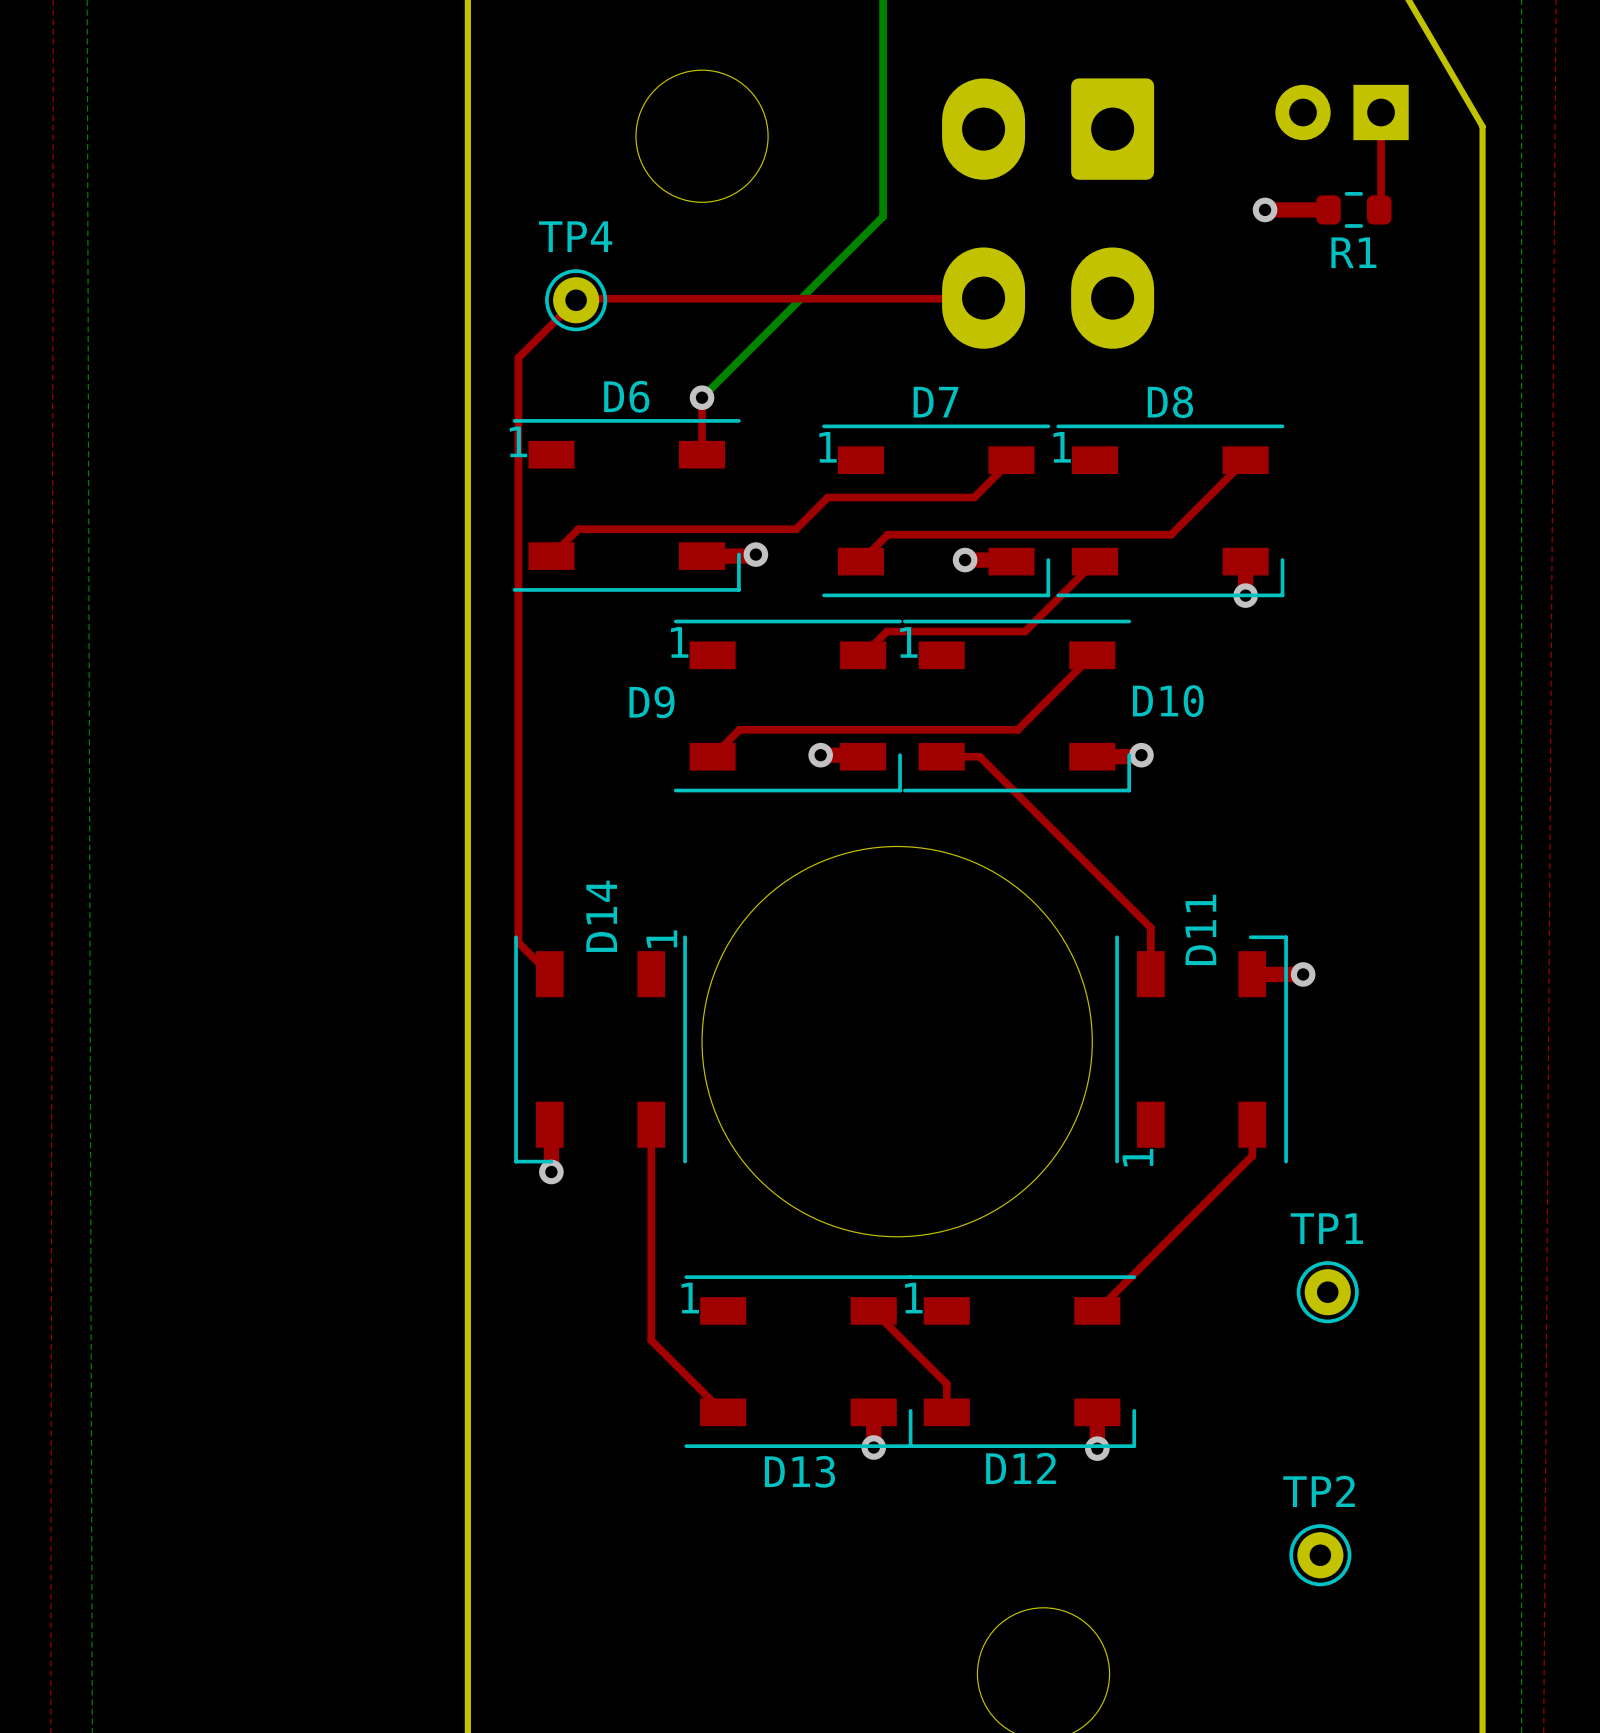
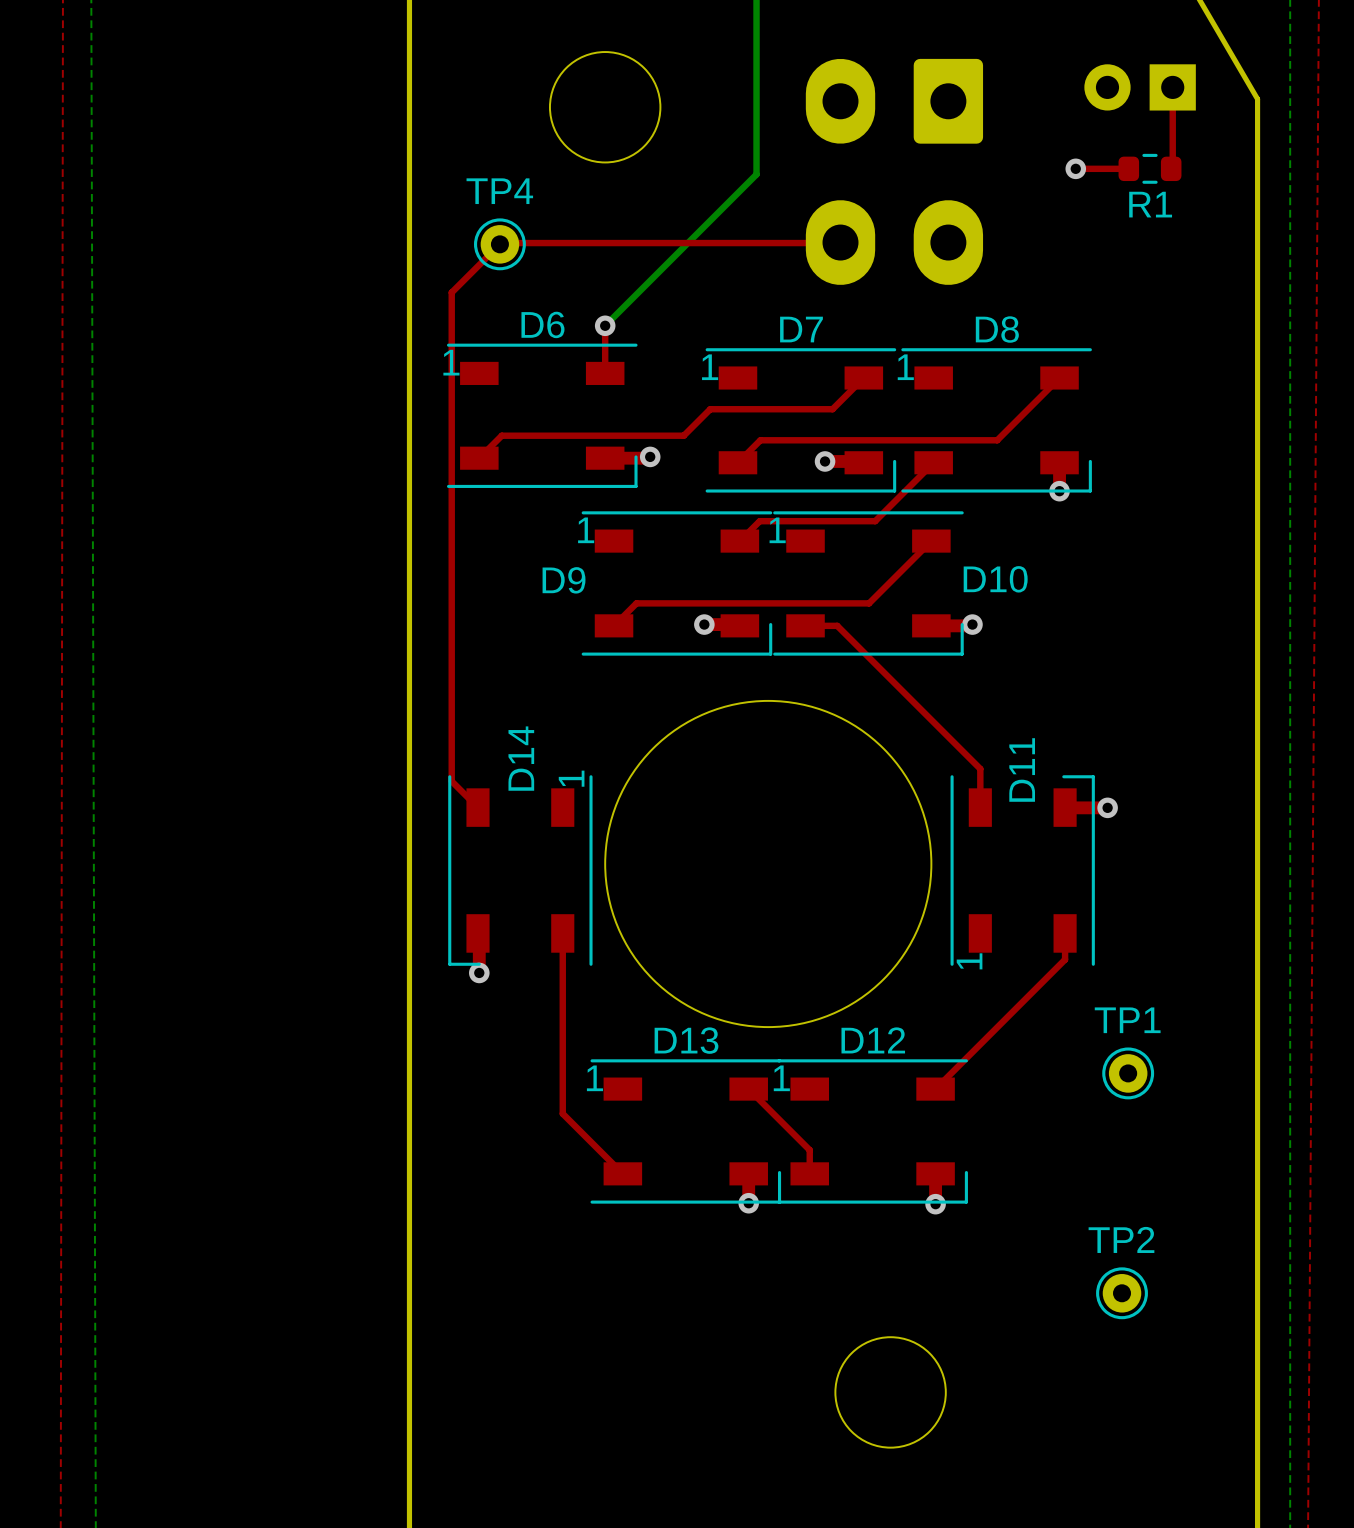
top track width: thick (1265, 209) (1328, 209) -> thin (1075, 168) (1128, 168)
D12 name position: D12 (1020, 1468) -> D12 (873, 1040)
D13 name position: D13 (799, 1471) -> D13 (686, 1040)

